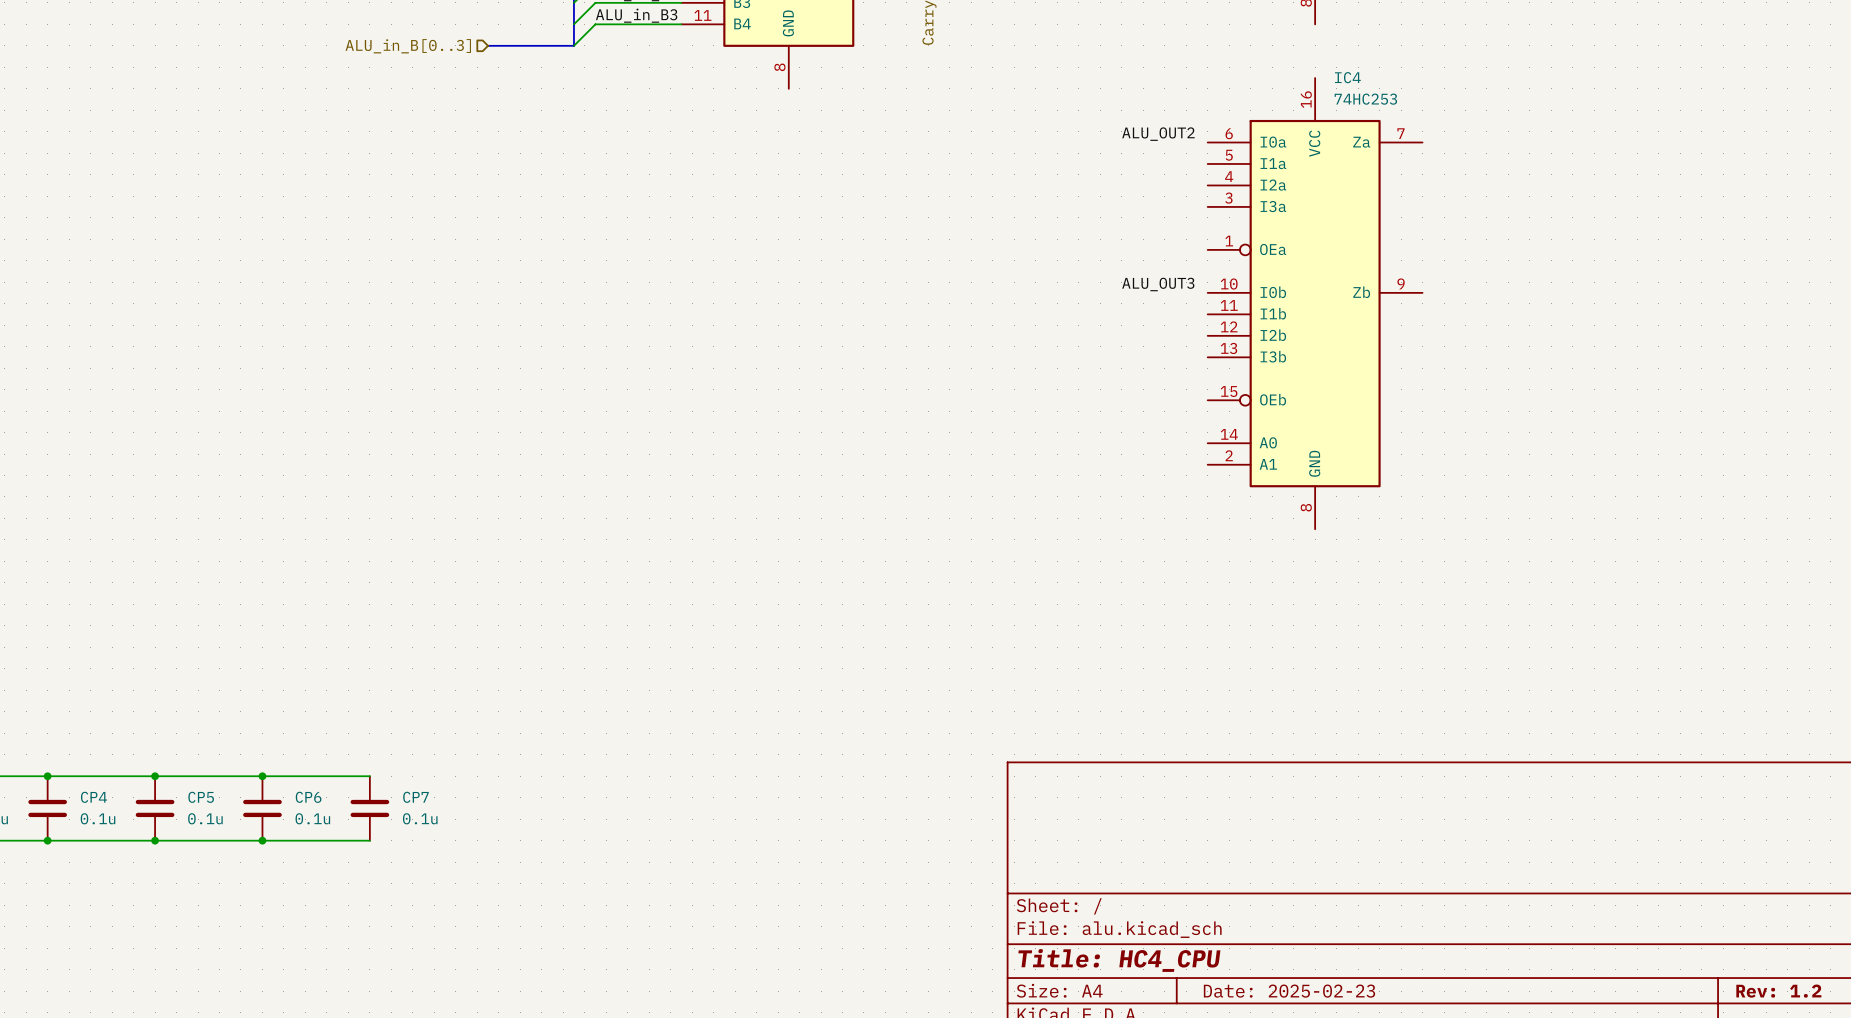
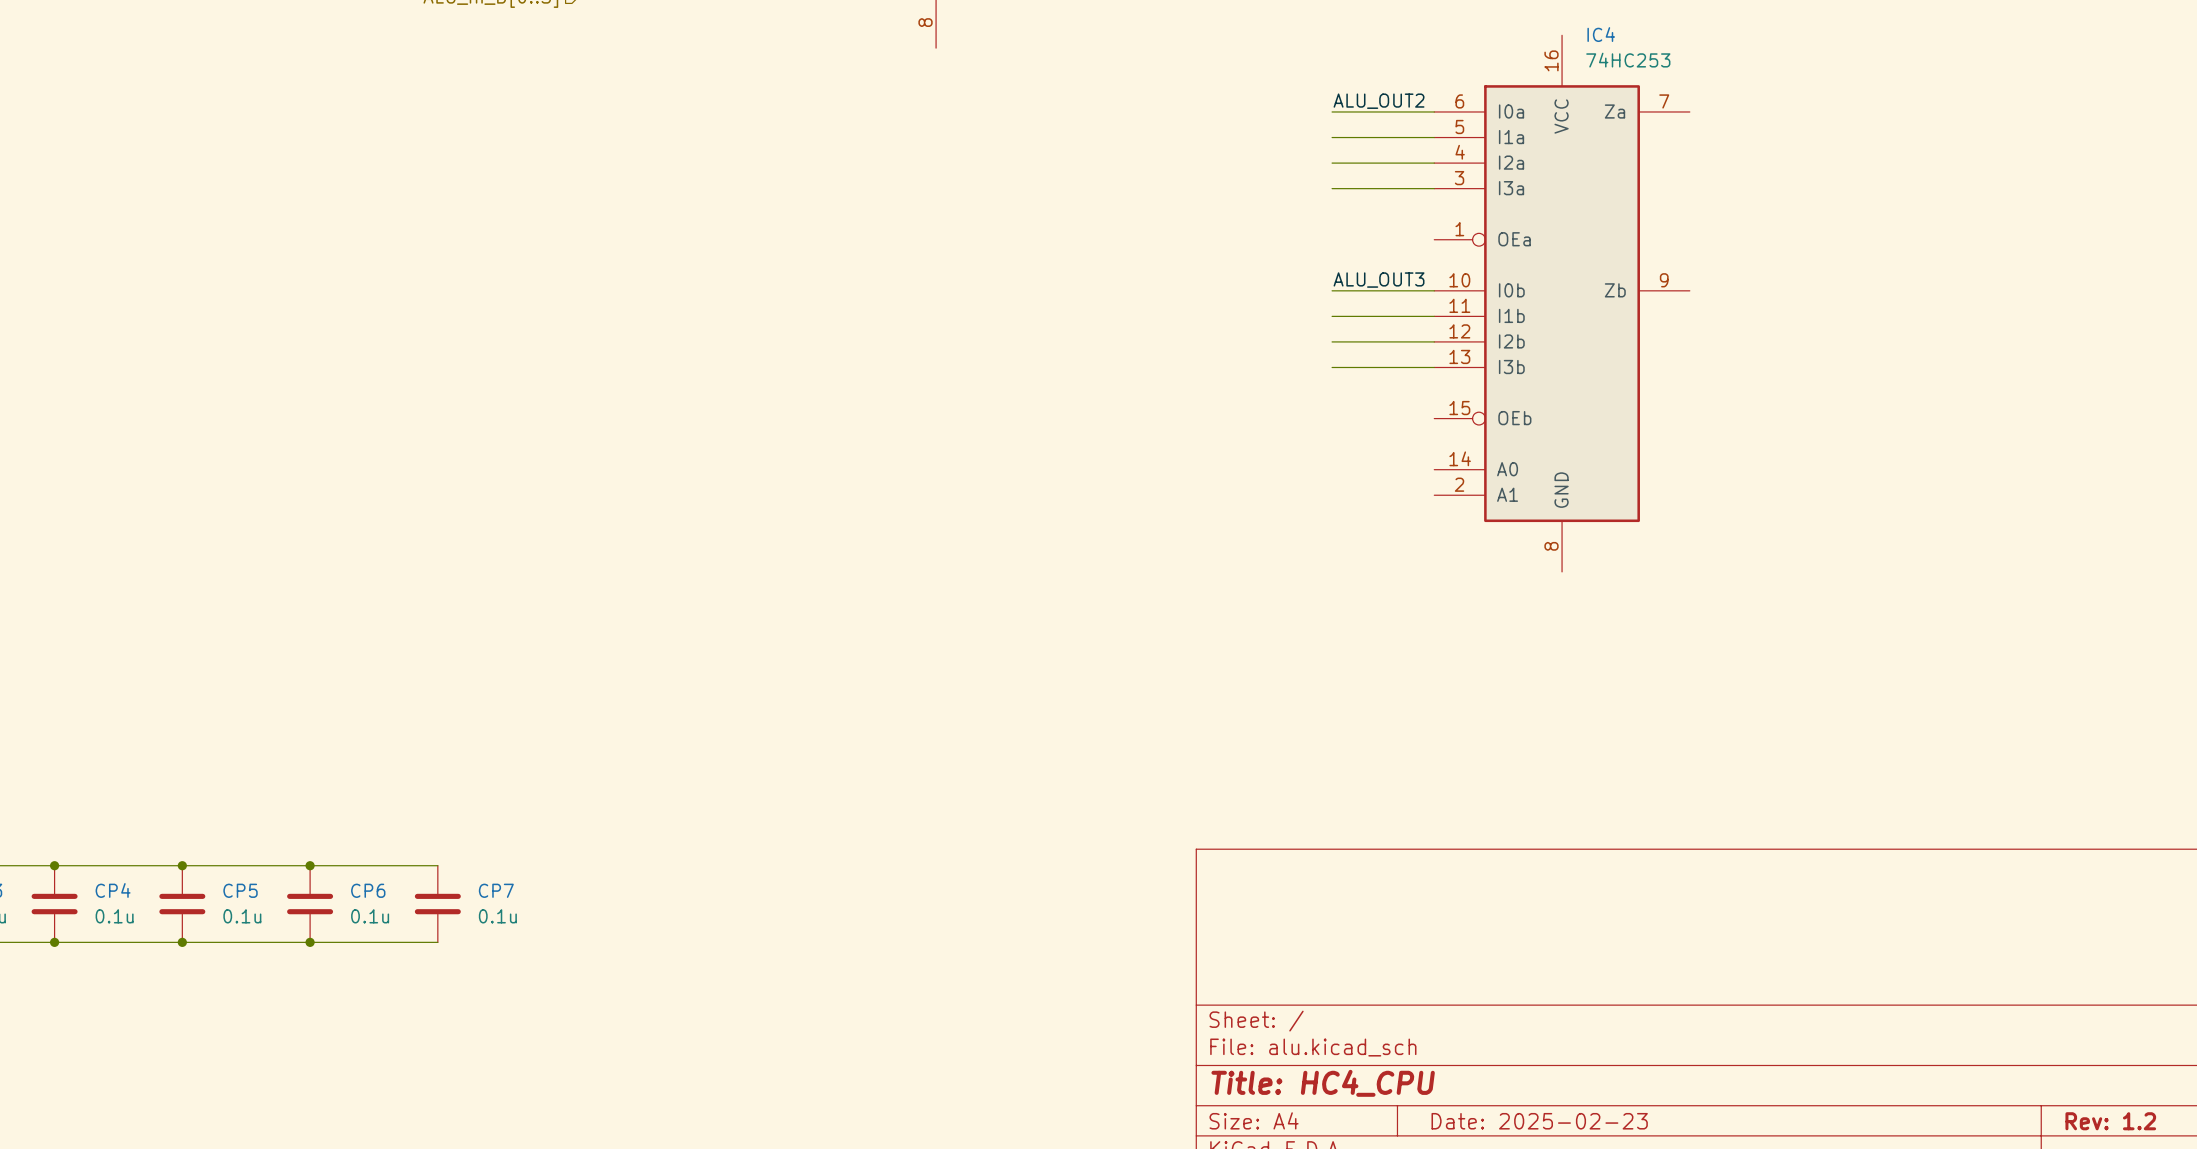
wire: none -> (1332, 111) (1434, 111)
wire: none -> (1332, 137) (1434, 137)
wire: none -> (1332, 163) (1434, 163)
wire: none -> (1332, 188) (1434, 188)
wire: none -> (1332, 290) (1434, 290)
wire: none -> (1332, 316) (1434, 316)
wire: none -> (1332, 341) (1434, 341)
wire: none -> (1332, 367) (1434, 367)

